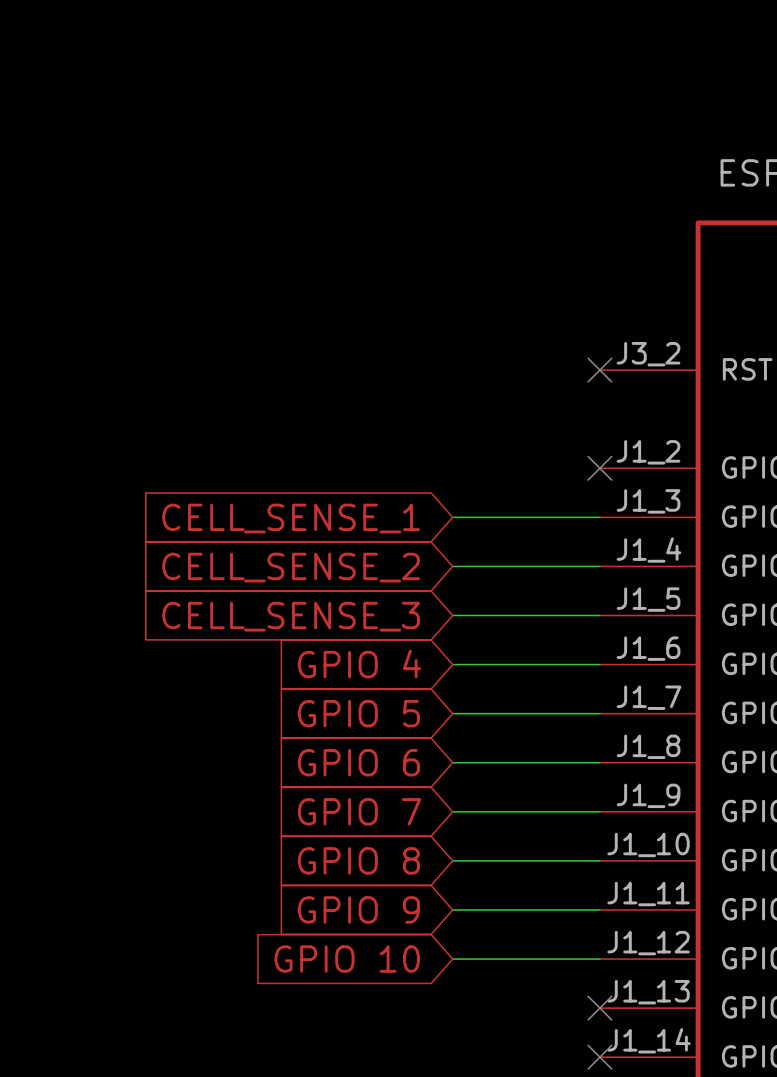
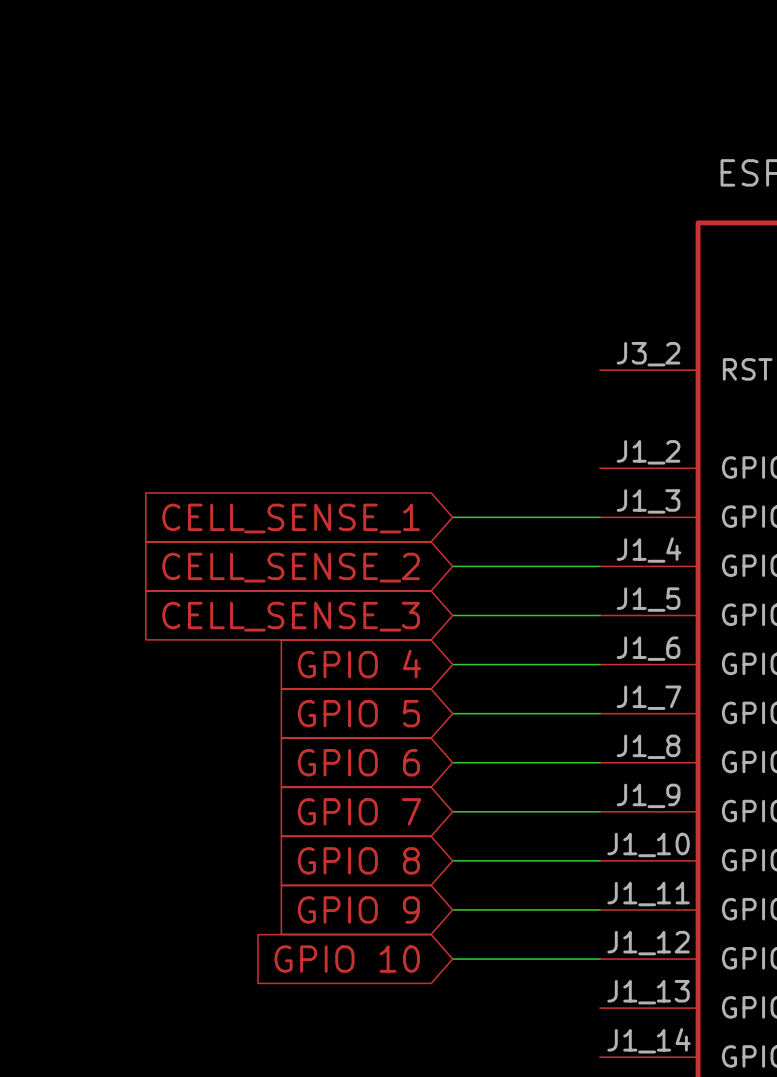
no-connect mark: (599, 370) -> none
no-connect mark: (599, 468) -> none
no-connect mark: (599, 1008) -> none
no-connect mark: (599, 1057) -> none

